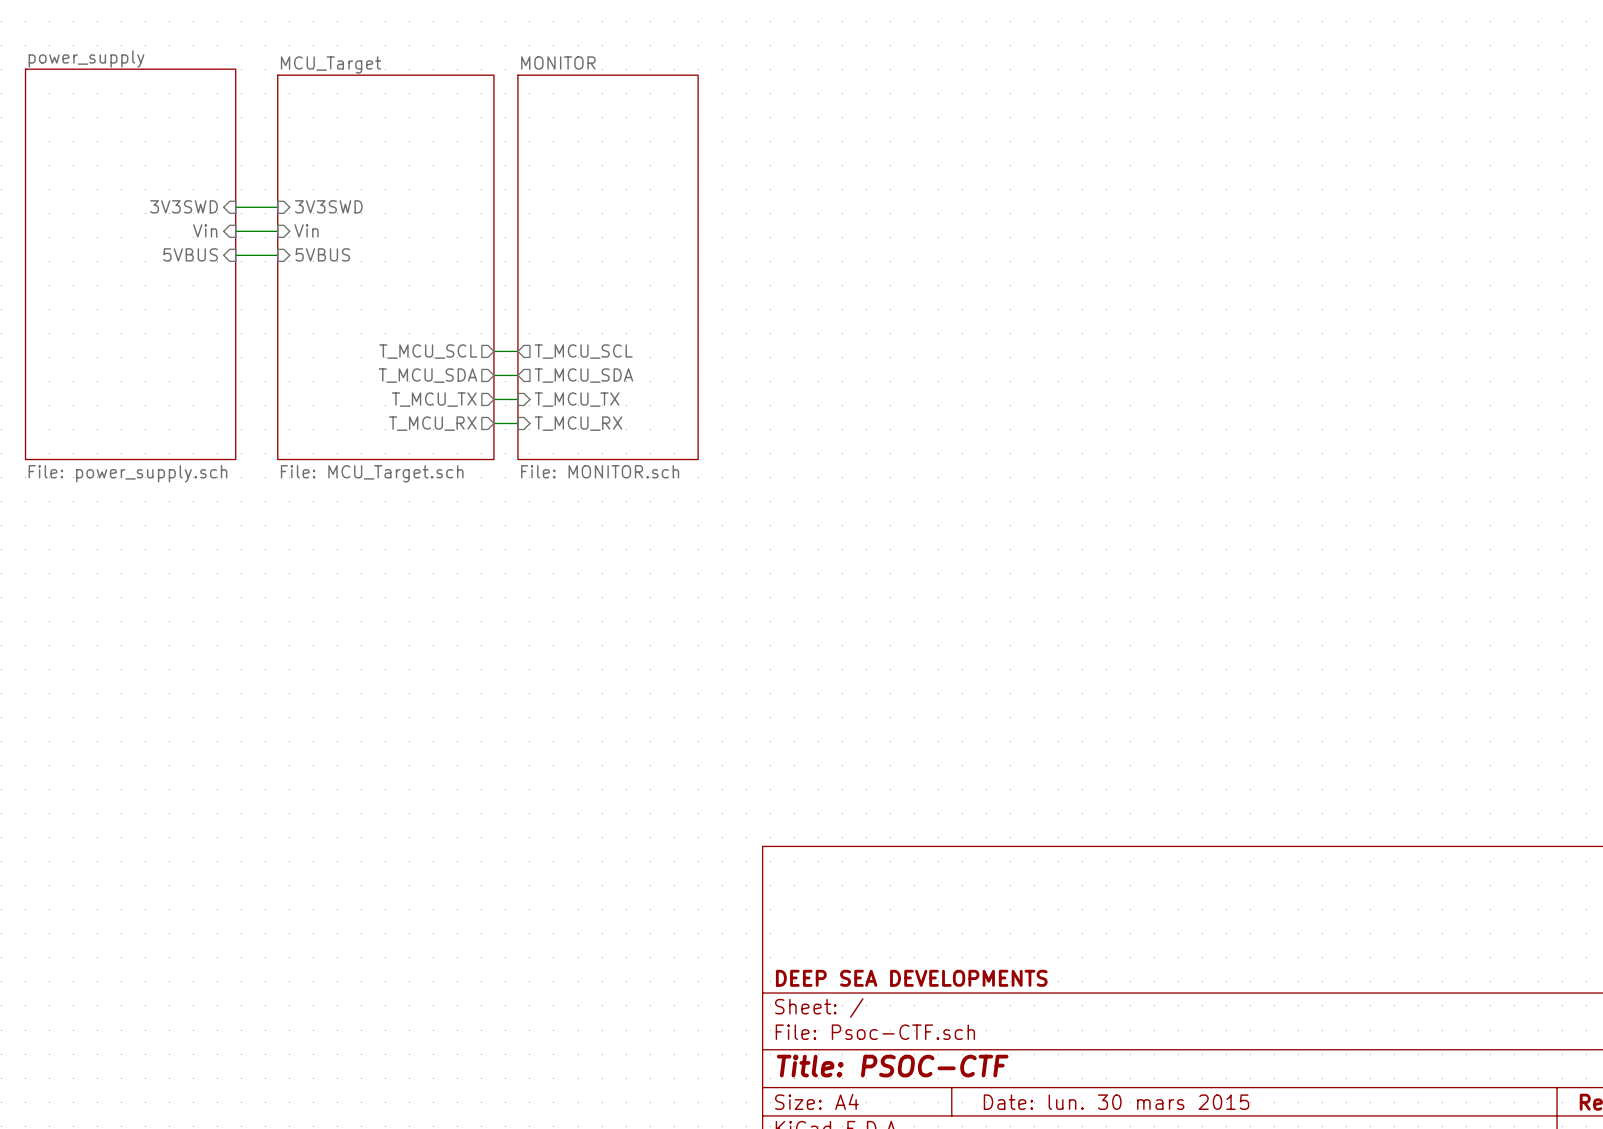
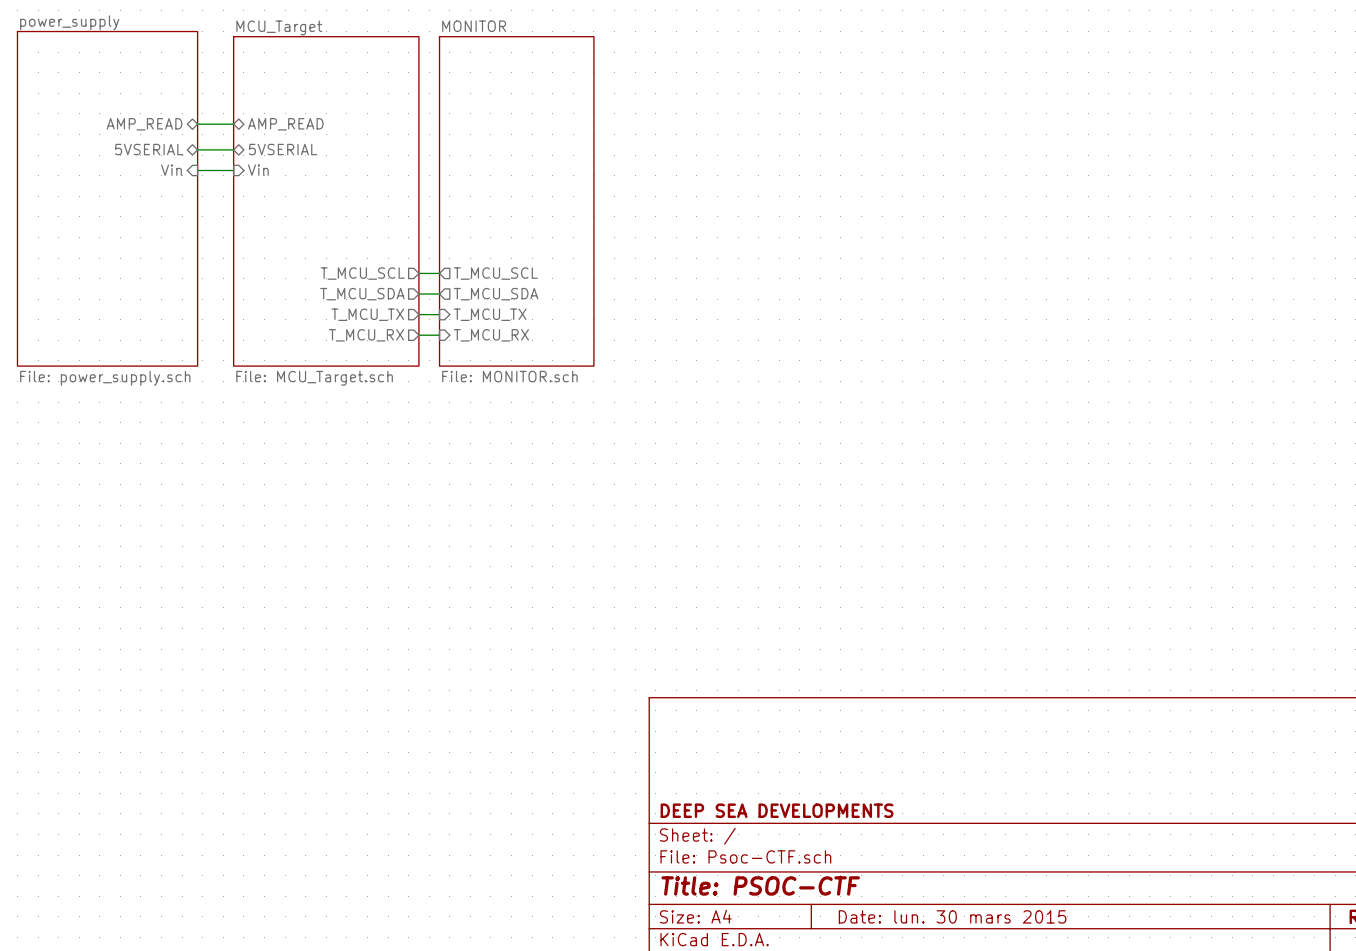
sheet pin: none -> AMP_READ (144, 124)
sheet pin: none -> AMP_READ (285, 124)
sheet pin shape: input (184, 206) -> bidirectional (149, 149)
sheet pin: 3V3SWD (184, 206) -> 5VSERIAL (149, 149)
sheet pin shape: input (328, 206) -> bidirectional (283, 149)
sheet pin: 3V3SWD (328, 206) -> 5VSERIAL (283, 149)
sheet pin: 5VBUS (190, 254) -> none
sheet pin: 5VBUS (322, 254) -> none
wire: (235, 255) (277, 255) -> (197, 124) (233, 124)

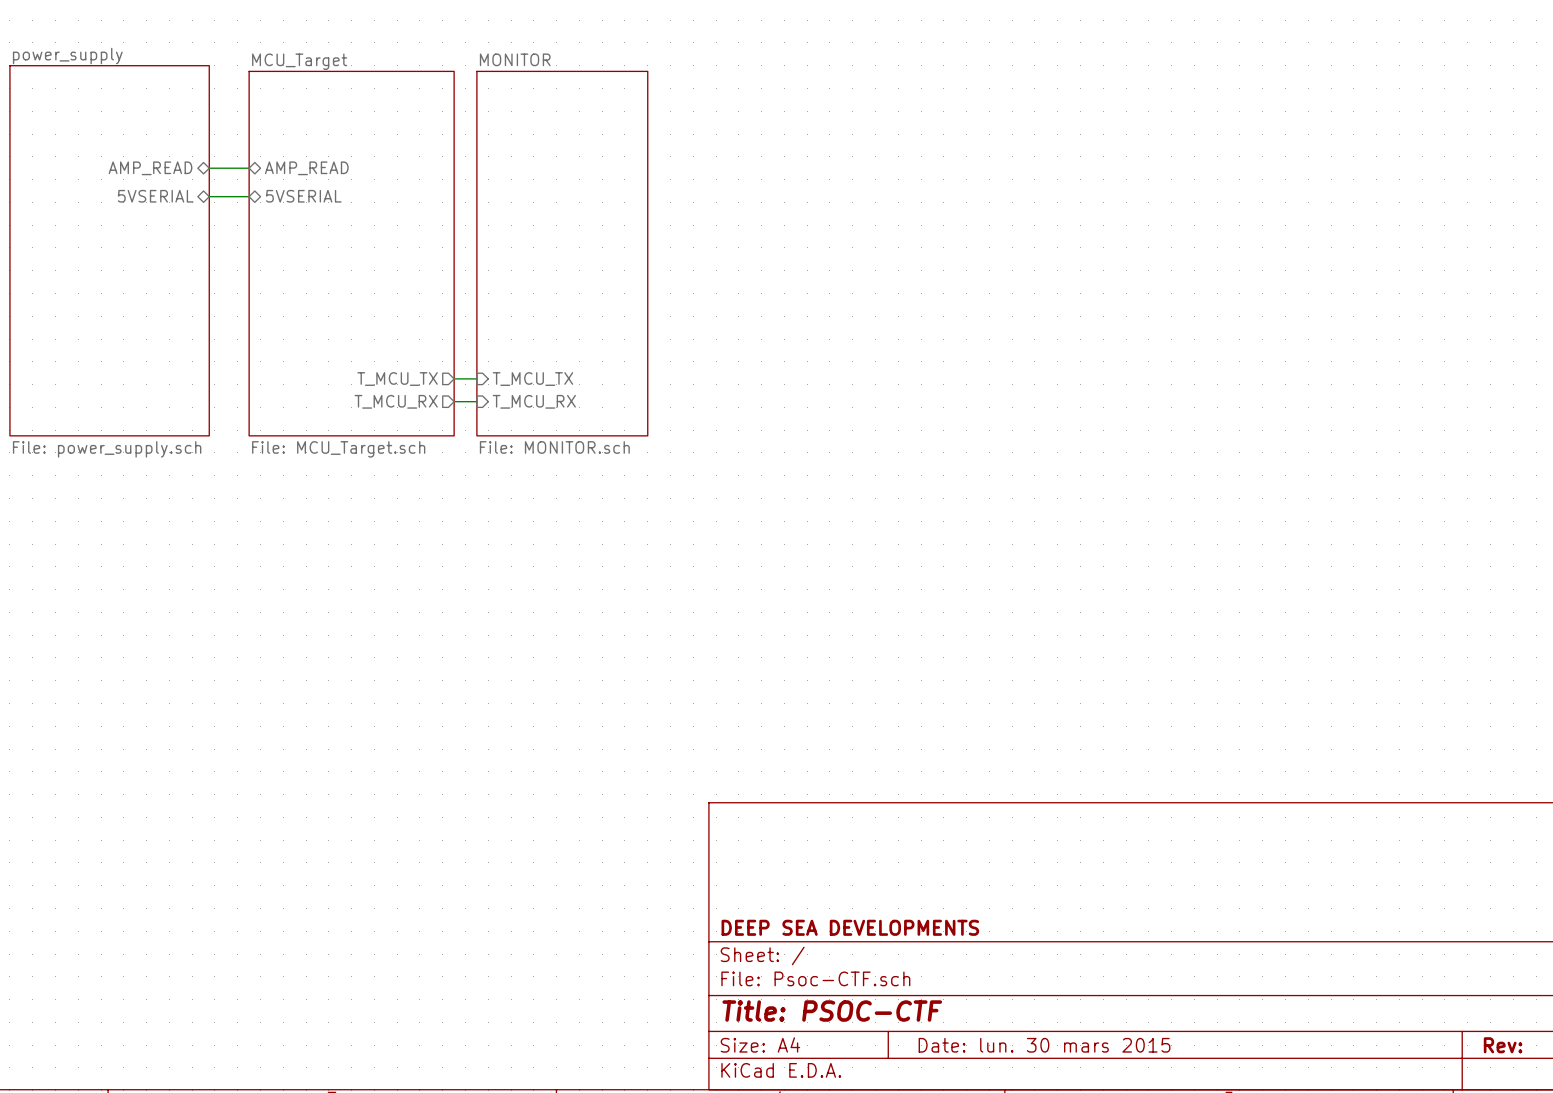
sheet pin: Vin (171, 170) -> none
wire: (197, 170) (233, 170) -> none
sheet pin: Vin (258, 170) -> none
sheet pin: T_MCU_SCL (362, 273) -> none
wire: (418, 273) (439, 273) -> none
sheet pin: T_MCU_SCL (495, 273) -> none
sheet pin: T_MCU_SDA (362, 294) -> none
wire: (418, 294) (439, 294) -> none
sheet pin: T_MCU_SDA (496, 294) -> none

